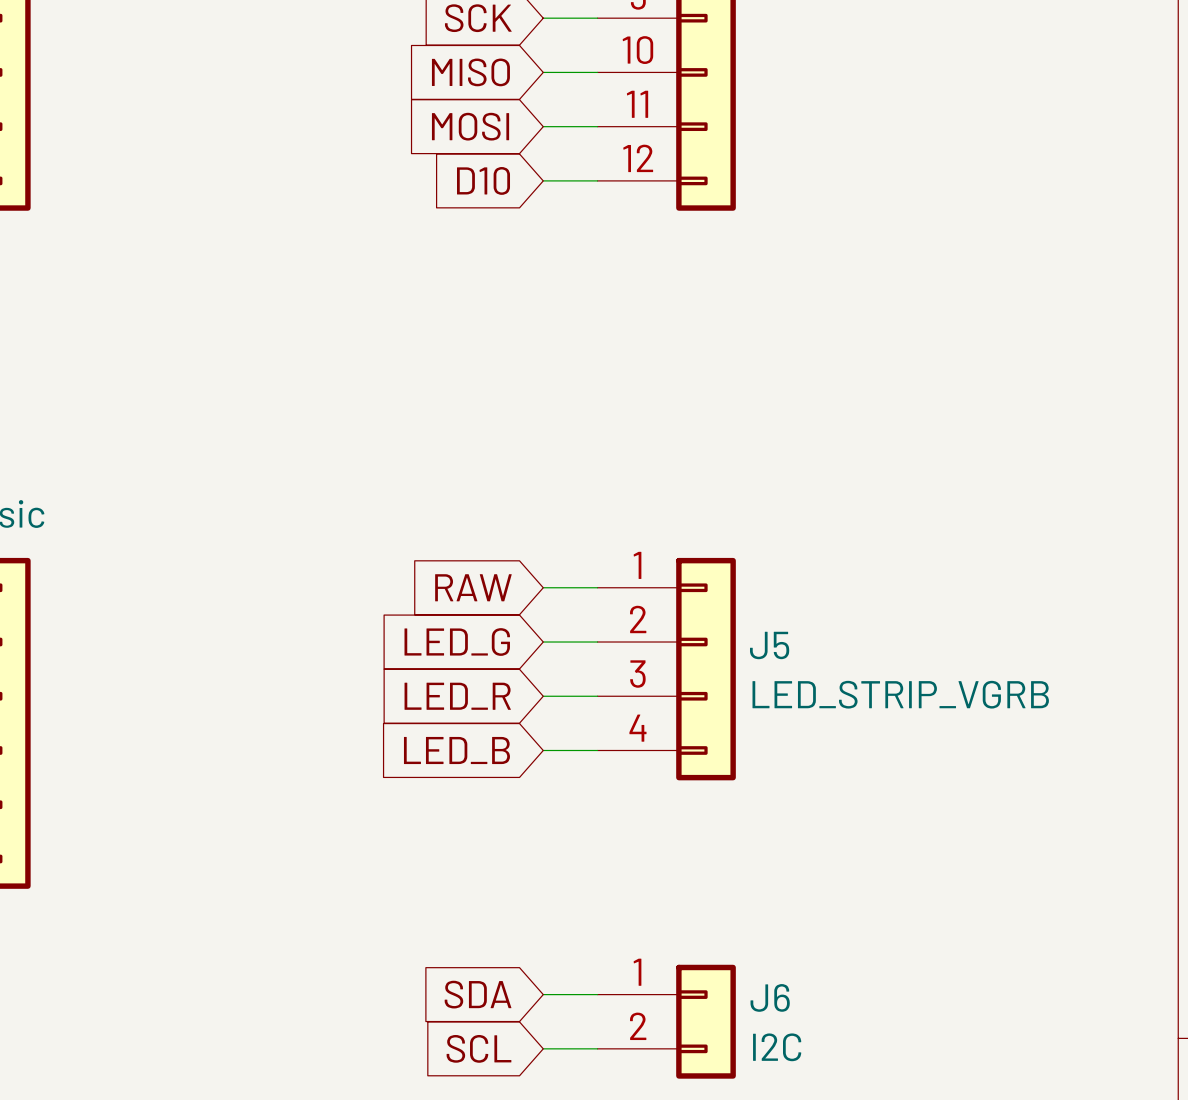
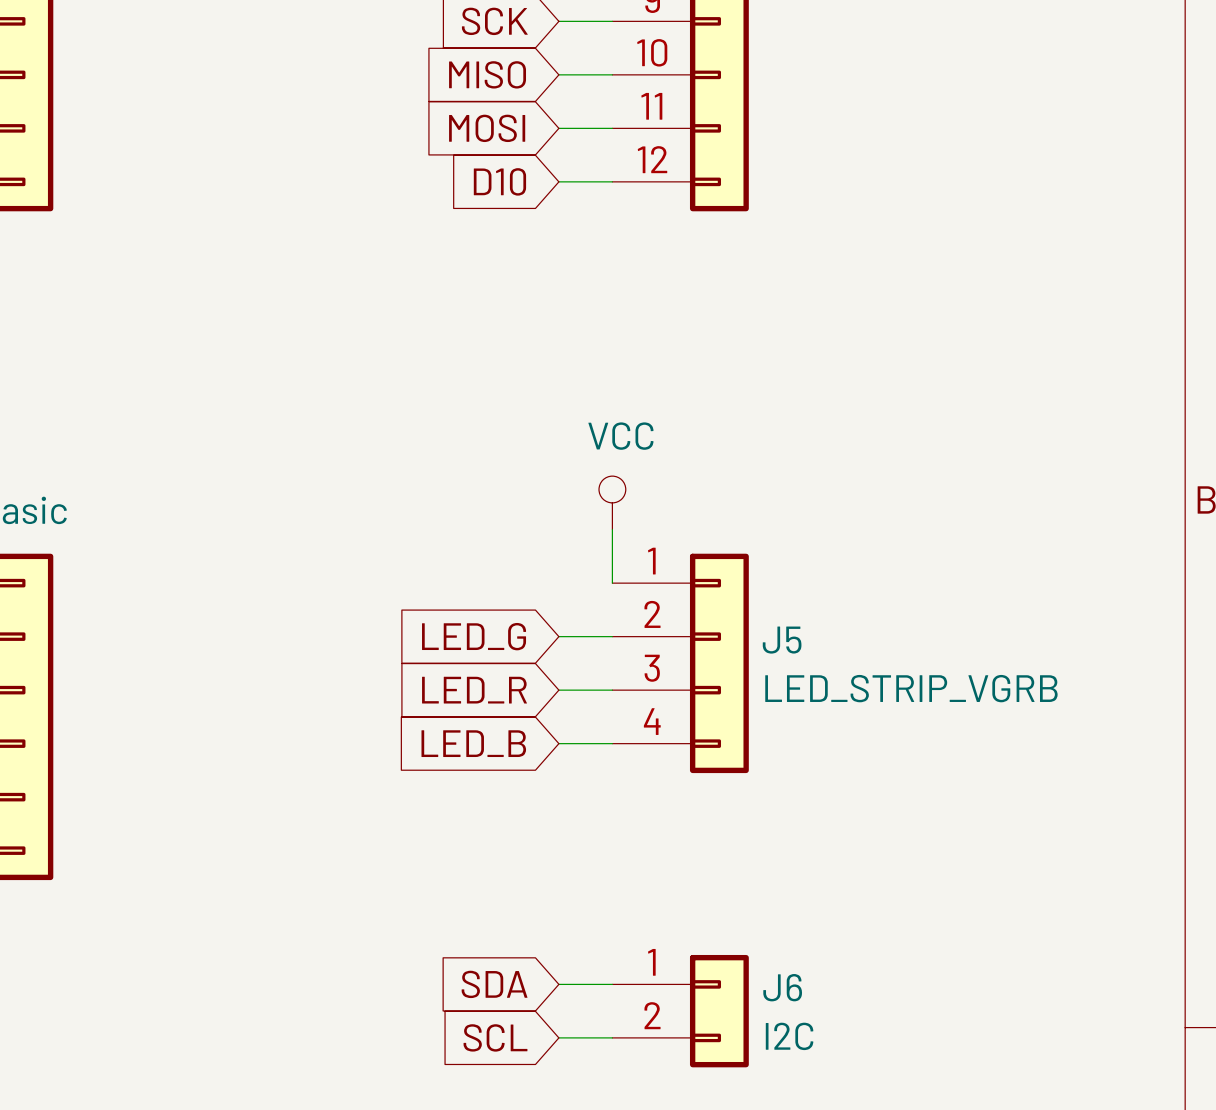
power symbol: none -> VCC (612, 502)
global label: RAW (473, 587) -> none
wire: (543, 587) (597, 587) -> (612, 529) (612, 583)

